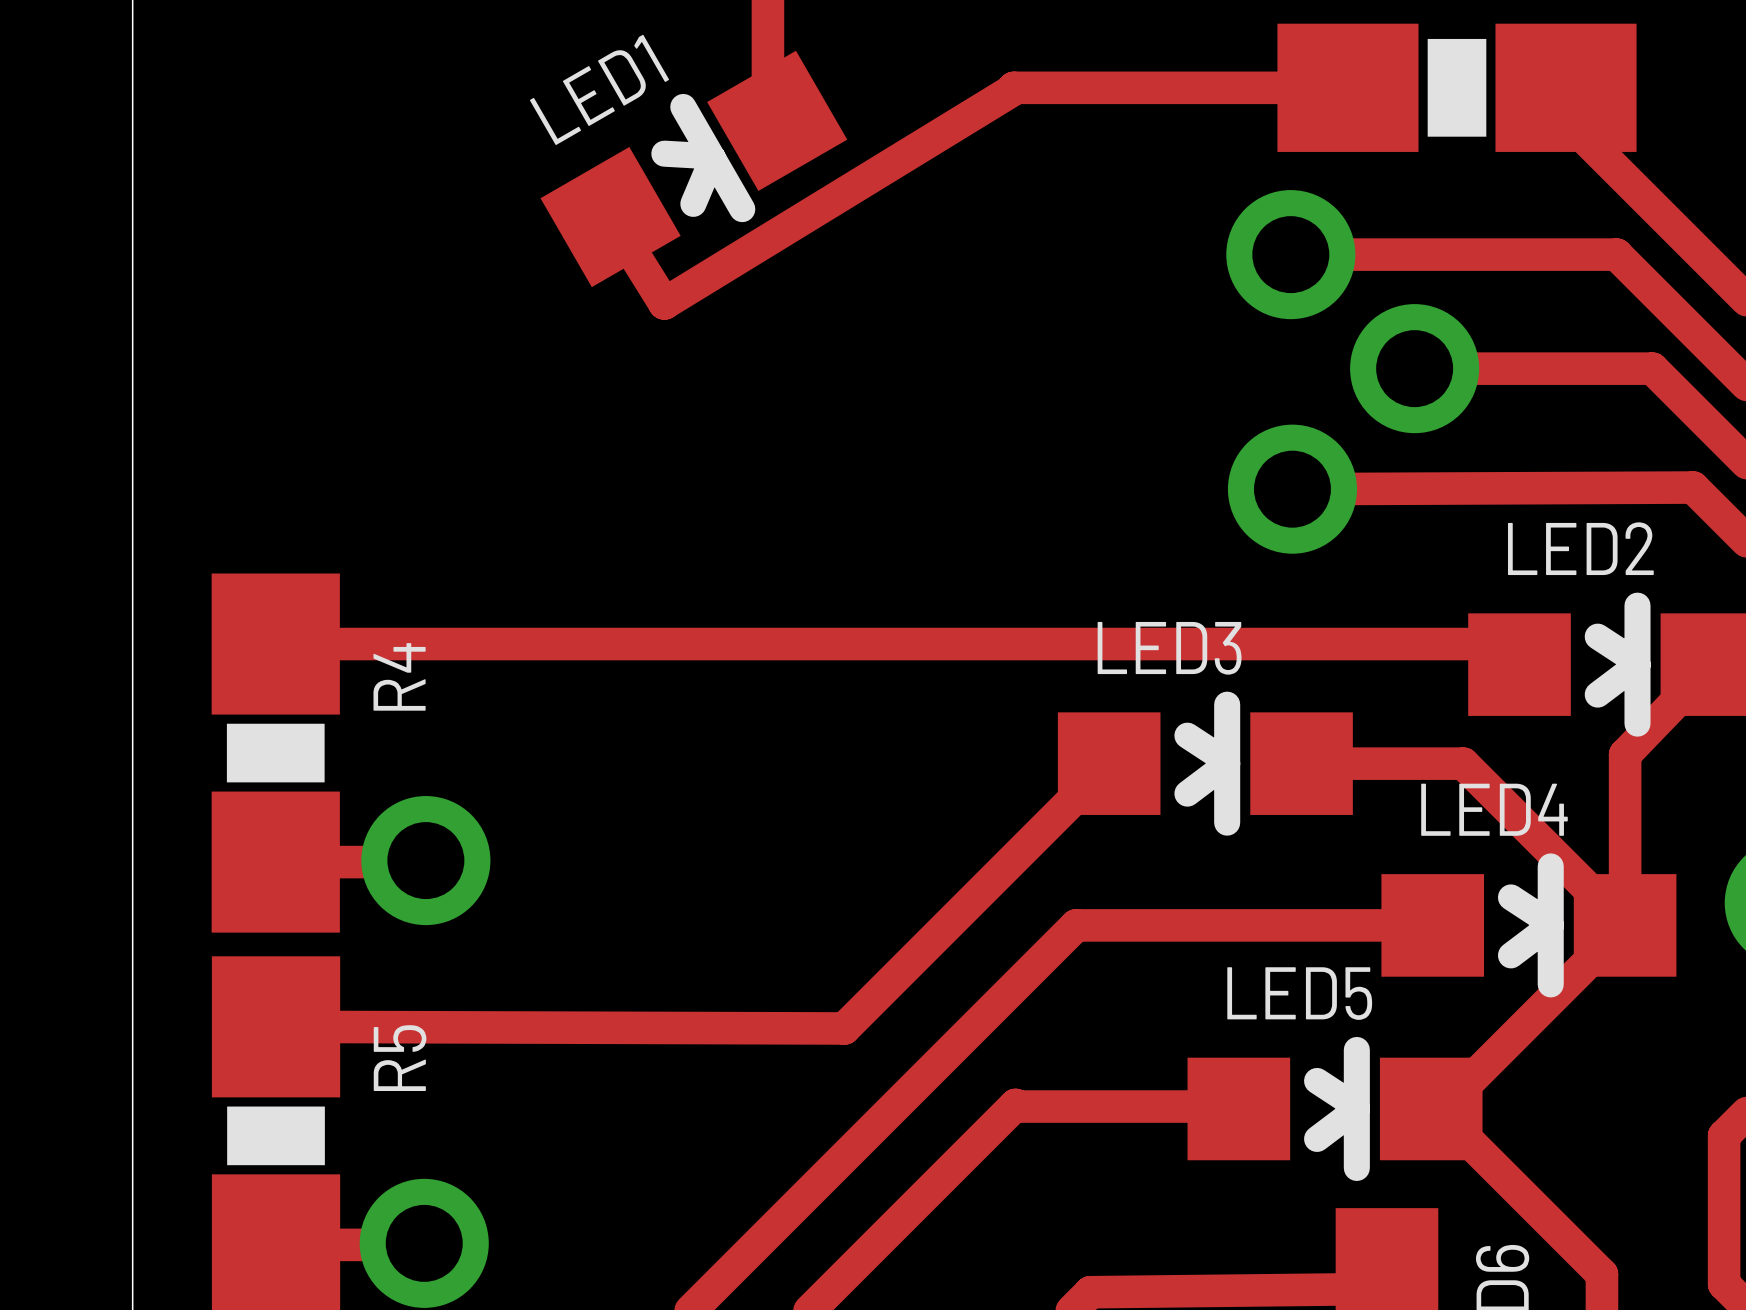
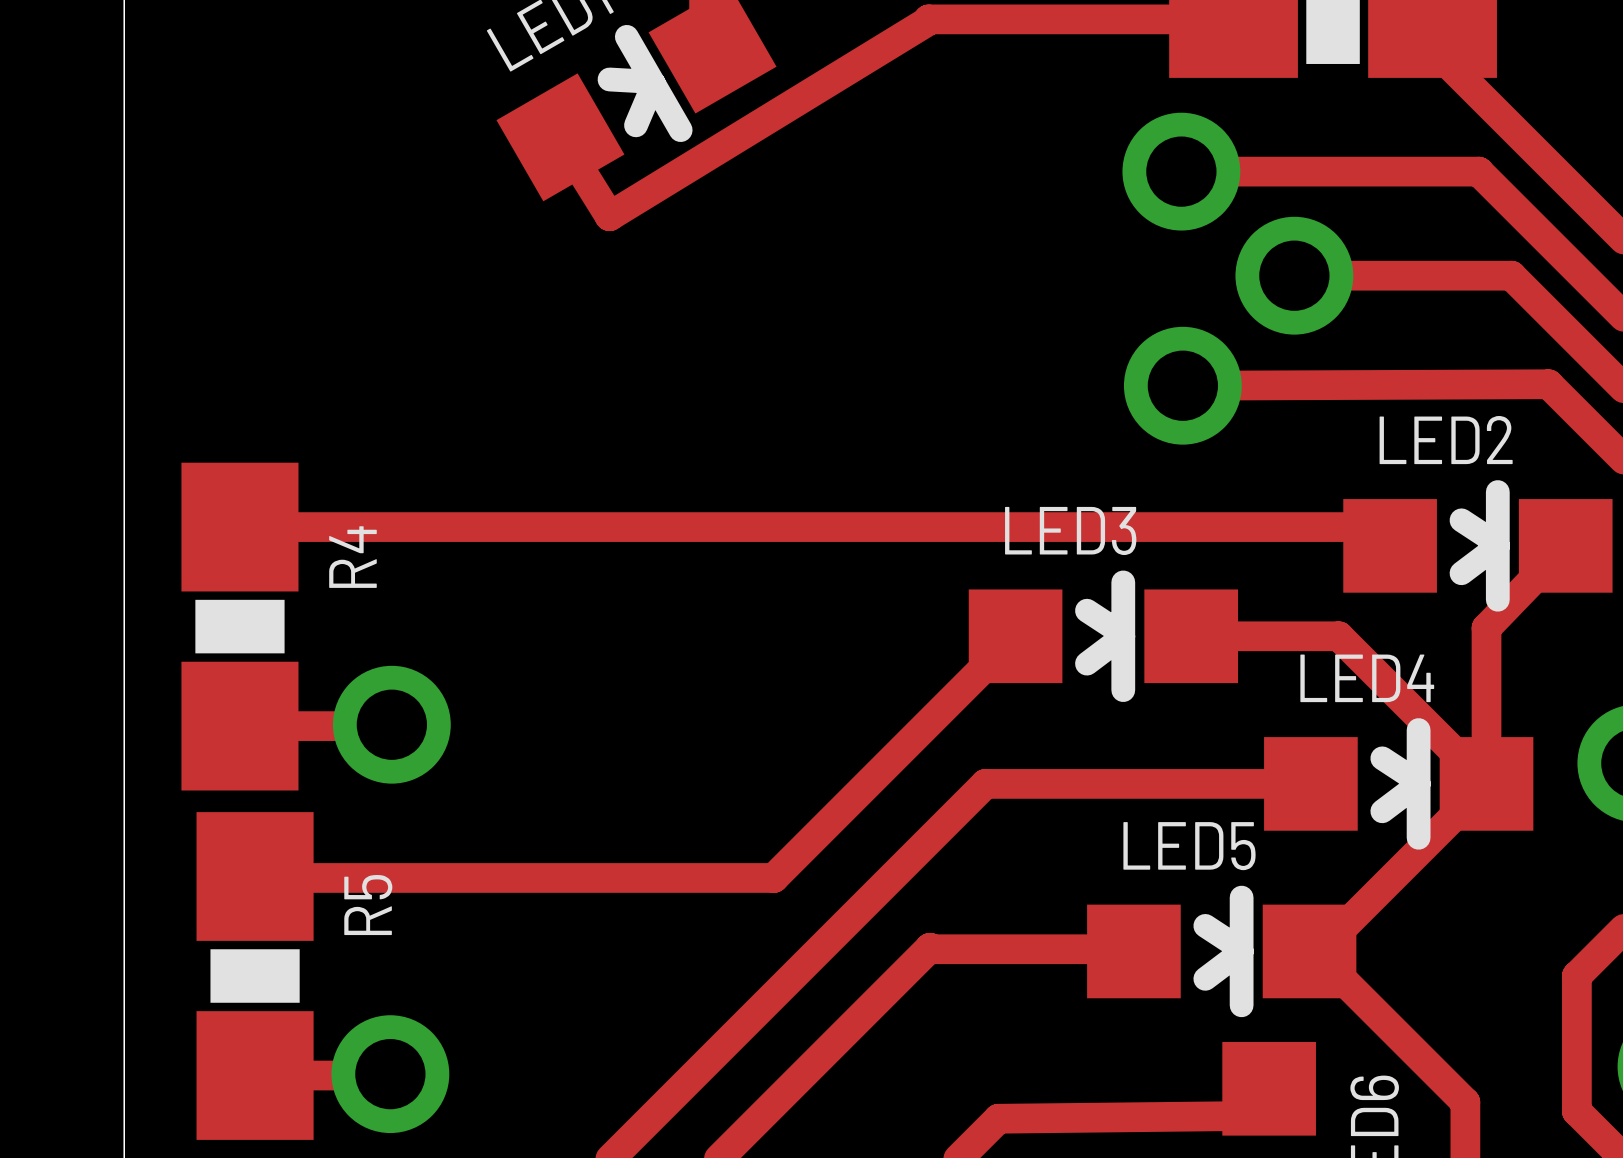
R4 position: (275, 753) -> (239, 626)
track: (276, 1026) (844, 1028) -> (240, 877) (773, 877)

